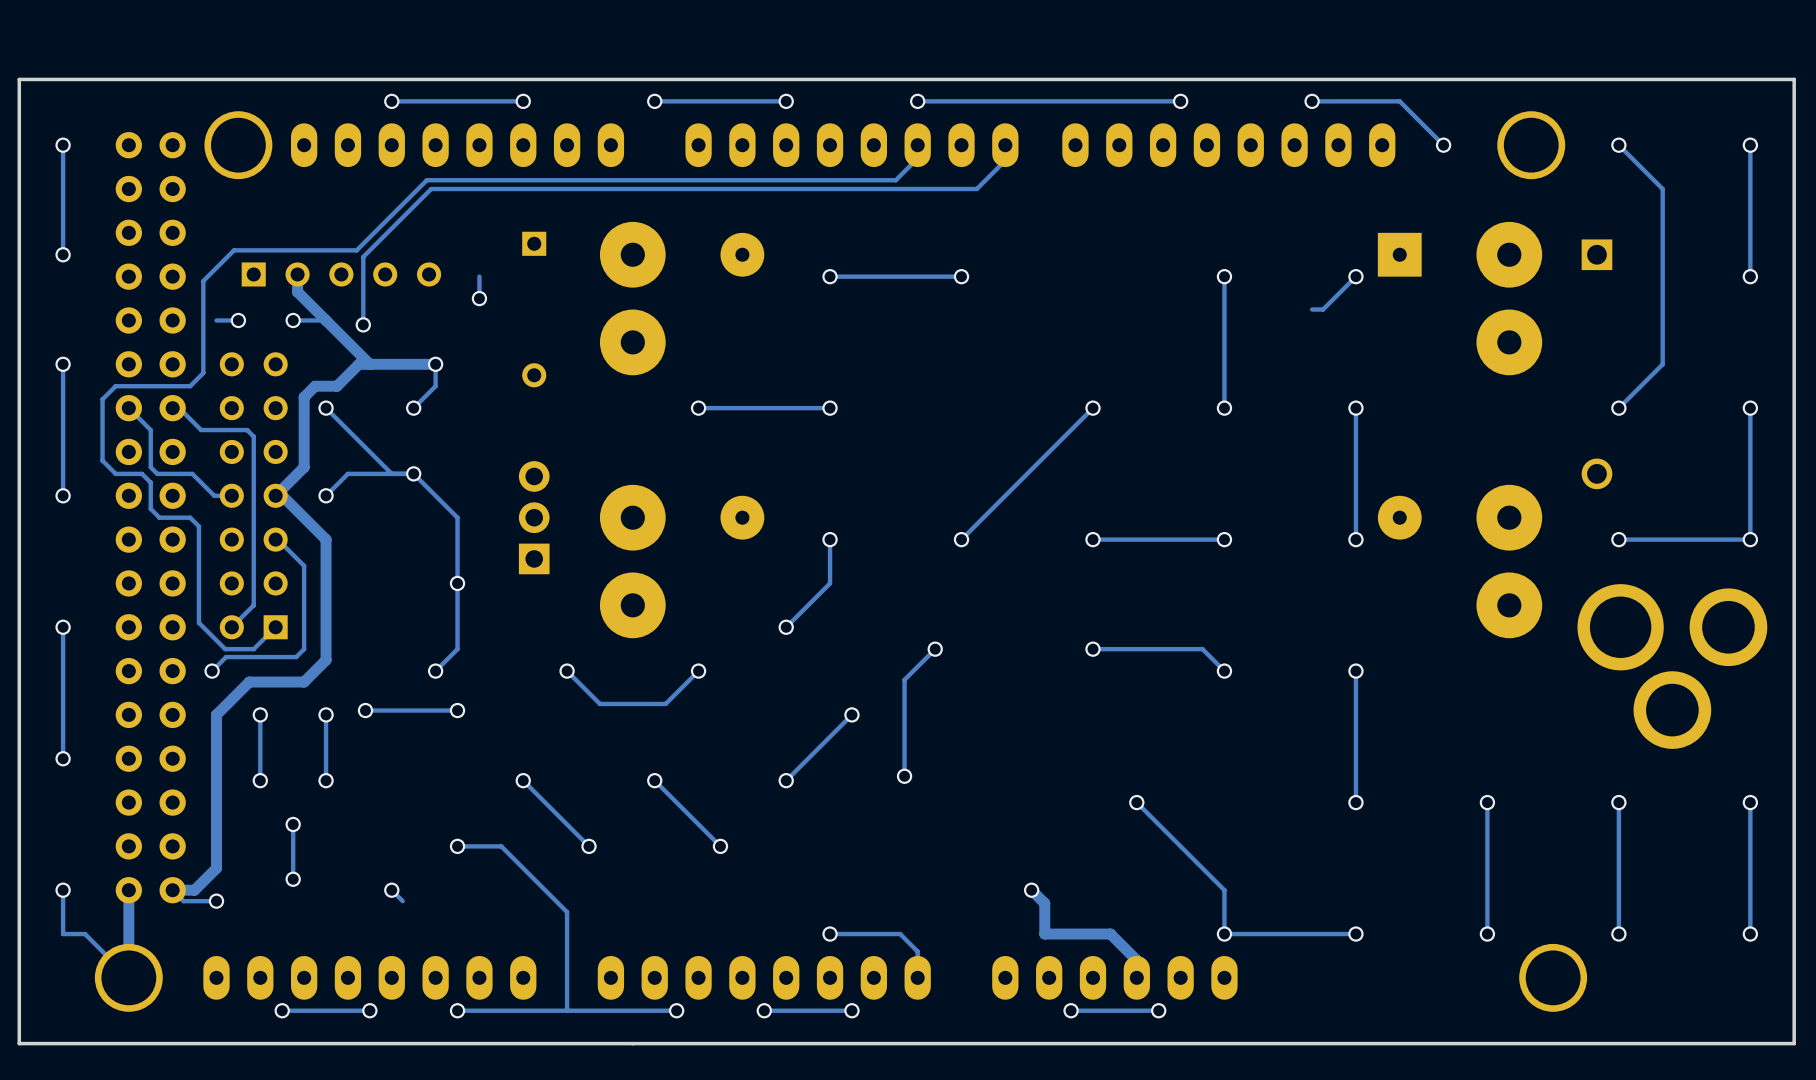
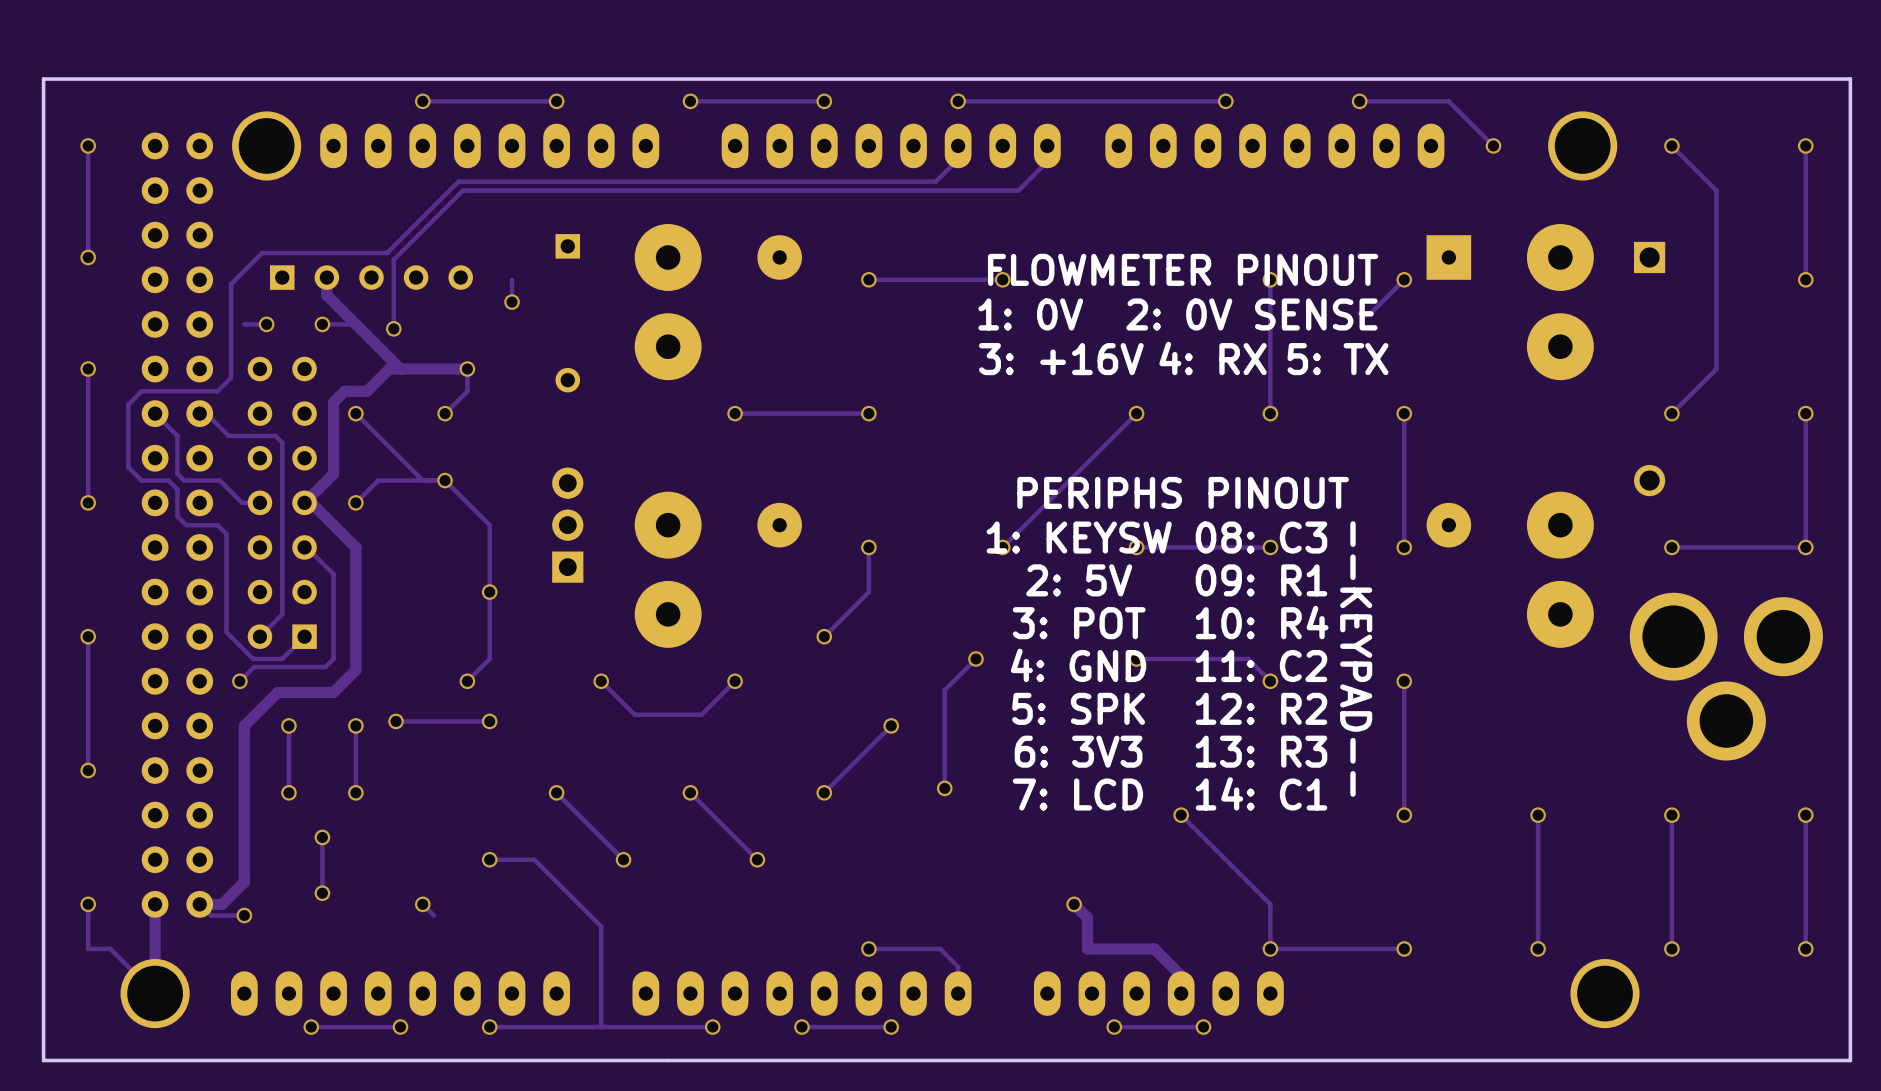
text: none -> FLOWMETER PINOUT (1183, 269)
text: none -> 1: 0V (1030, 314)
text: none -> 2: 0V SENSE (1251, 314)
text: none -> 4: RX (1213, 358)
text: none -> 3: +16V (1061, 359)
text: none -> 5: TX (1337, 359)
text: none -> PERIPHS PINOUT (1183, 492)
text: none -> 1: KEYSW (1079, 537)
text: none -> 08: C3 (1261, 537)
text: none -> 2: 5V (1079, 580)
text: none -> 09: R1 (1261, 580)
text: none -> 10: R4 (1262, 622)
text: none -> 3: POT (1079, 623)
text: none -> --KEYPAD-- (1356, 658)
text: none -> 4: GND (1078, 665)
text: none -> 11: C2 (1261, 666)
text: none -> 5: SPK (1078, 708)
text: none -> 12: R2 (1261, 708)
text: none -> 6: 3V3 (1078, 751)
text: none -> 13: R3 (1261, 751)
text: none -> 14: C1 (1261, 793)
text: none -> 7: LCD (1077, 794)

